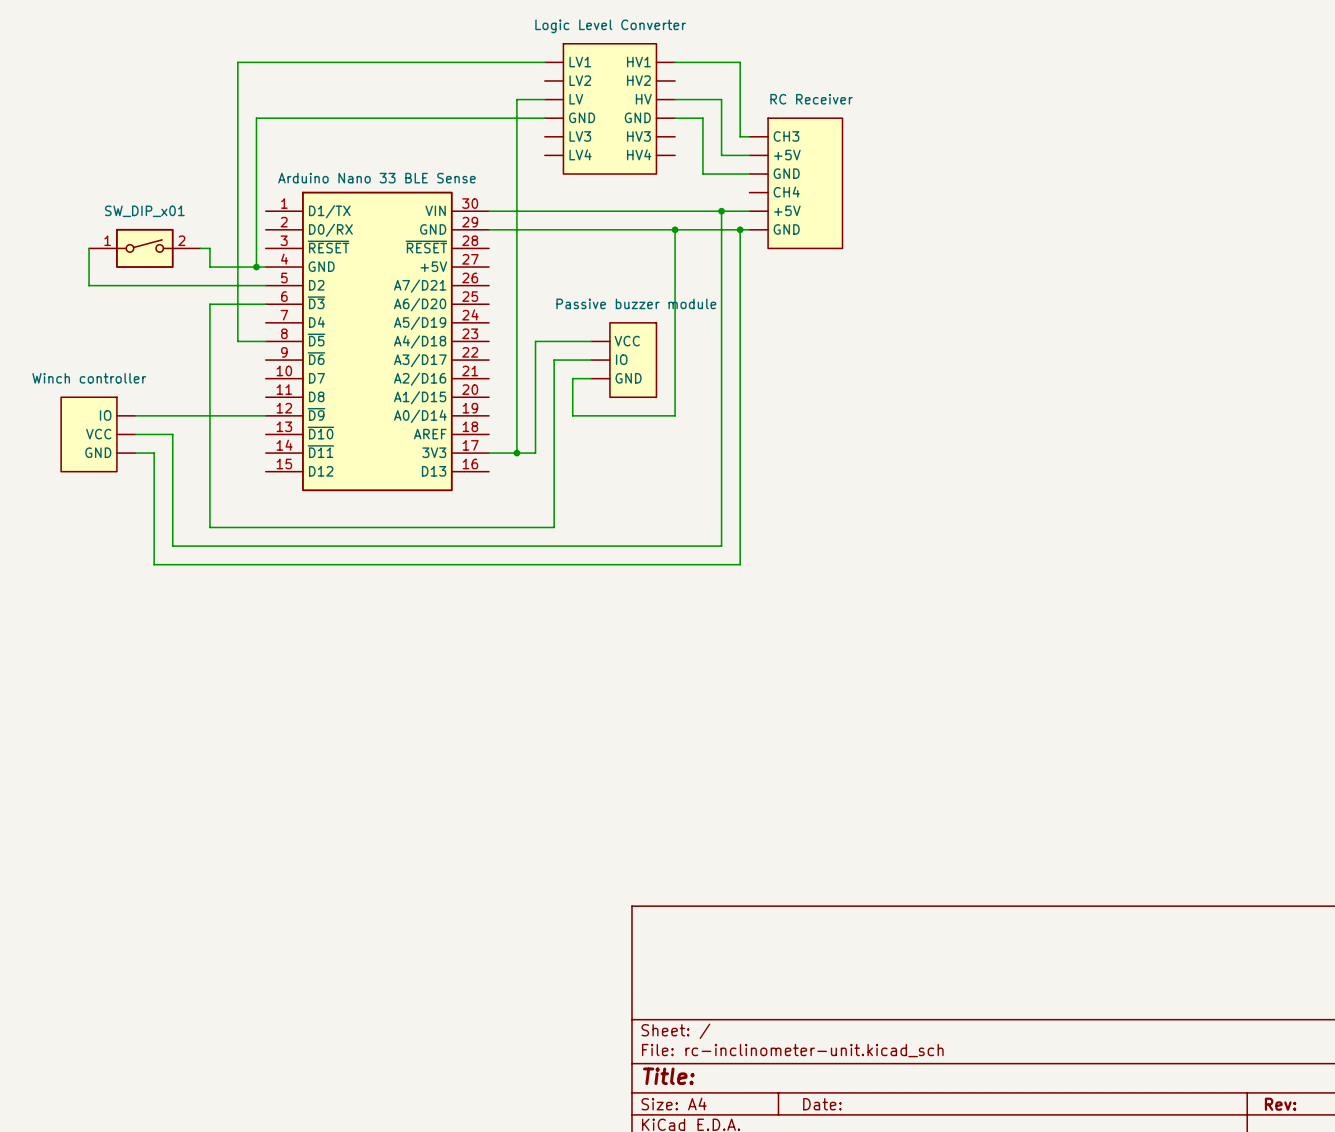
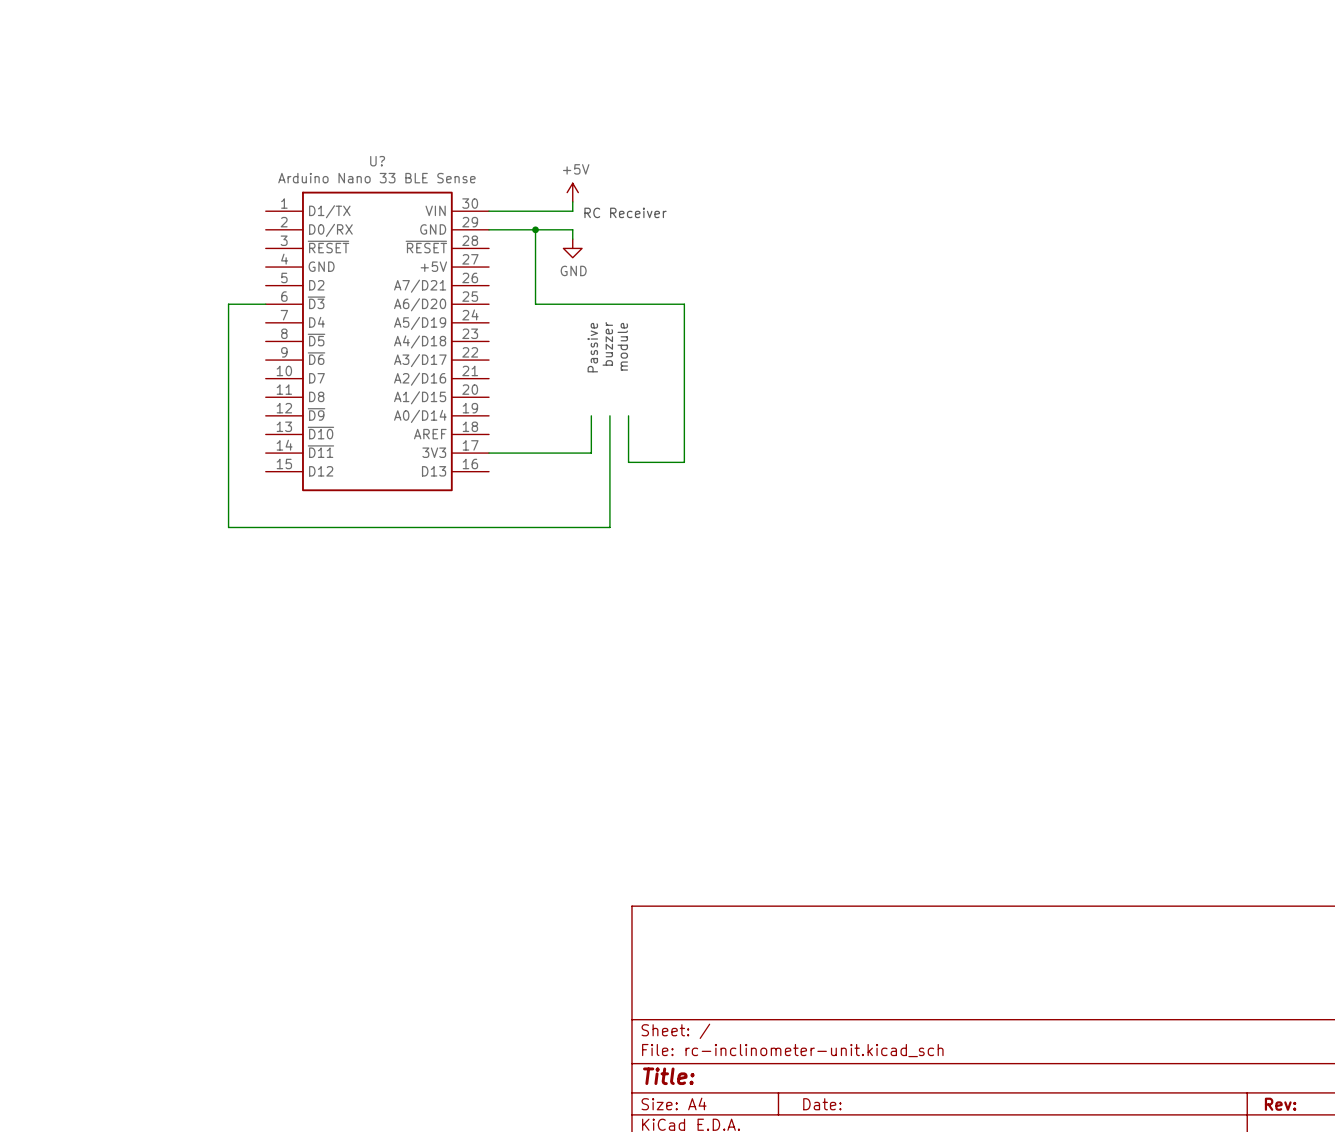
wire: (544, 62) (237, 62) (237, 341) (265, 341) -> none
wire: (675, 62) (740, 62) (740, 136) (749, 136) -> none
wire: (544, 99) (516, 99) (516, 453) -> none
wire: (675, 99) (721, 99) (721, 155) (749, 155) -> none
part: Logic Level Converter (609, 108) -> none
wire: (544, 118) (256, 118) (256, 267) -> none
wire: (675, 118) (702, 118) (702, 174) (749, 174) -> none
U? name: none -> U? (377, 161)
part: RC Receiver (795, 183) -> none
power symbol: none -> +5V (572, 192)
wire: (572, 211) (749, 211) -> (572, 211) (572, 201)
wire: (721, 211) (721, 546) (172, 546) (172, 434) (135, 434) -> none
junction: (721, 211) -> none
text: none -> RC Receiver (625, 212)
wire: none -> (535, 229) (535, 304) (684, 304) (684, 462) (628, 462) (628, 415)
junction: none -> (535, 229)
wire: (572, 229) (749, 229) -> (572, 229) (572, 239)
wire: (675, 229) (675, 415) (572, 415) (572, 378) (591, 378) -> none
junction: (675, 229) -> none
wire: (740, 229) (740, 564) (154, 564) (154, 453) (135, 453) -> none
junction: (740, 229) -> none
wire: (89, 248) (89, 285) (265, 285) -> none
part: SW_DIP_x01 (144, 248) -> none
wire: (200, 248) (209, 248) (209, 267) (265, 267) -> none
power symbol: none -> GND (572, 248)
junction: (256, 267) -> none
wire: (228, 304) (209, 304) (209, 527) (228, 527) -> (228, 304) (228, 527)
wire: (591, 341) (535, 341) (535, 453) -> (591, 415) (591, 453) (535, 453)
text: none -> buzzer (607, 343)
text: none -> module (622, 346)
text: none -> Passive (592, 347)
wire: (591, 360) (554, 360) (554, 527) -> (609, 415) (609, 527) (554, 527)
part: Passive buzzer module (623, 360) -> none
wire: (135, 415) (265, 415) -> none
part: Winch controller (98, 434) -> none
junction: (516, 453) -> none

